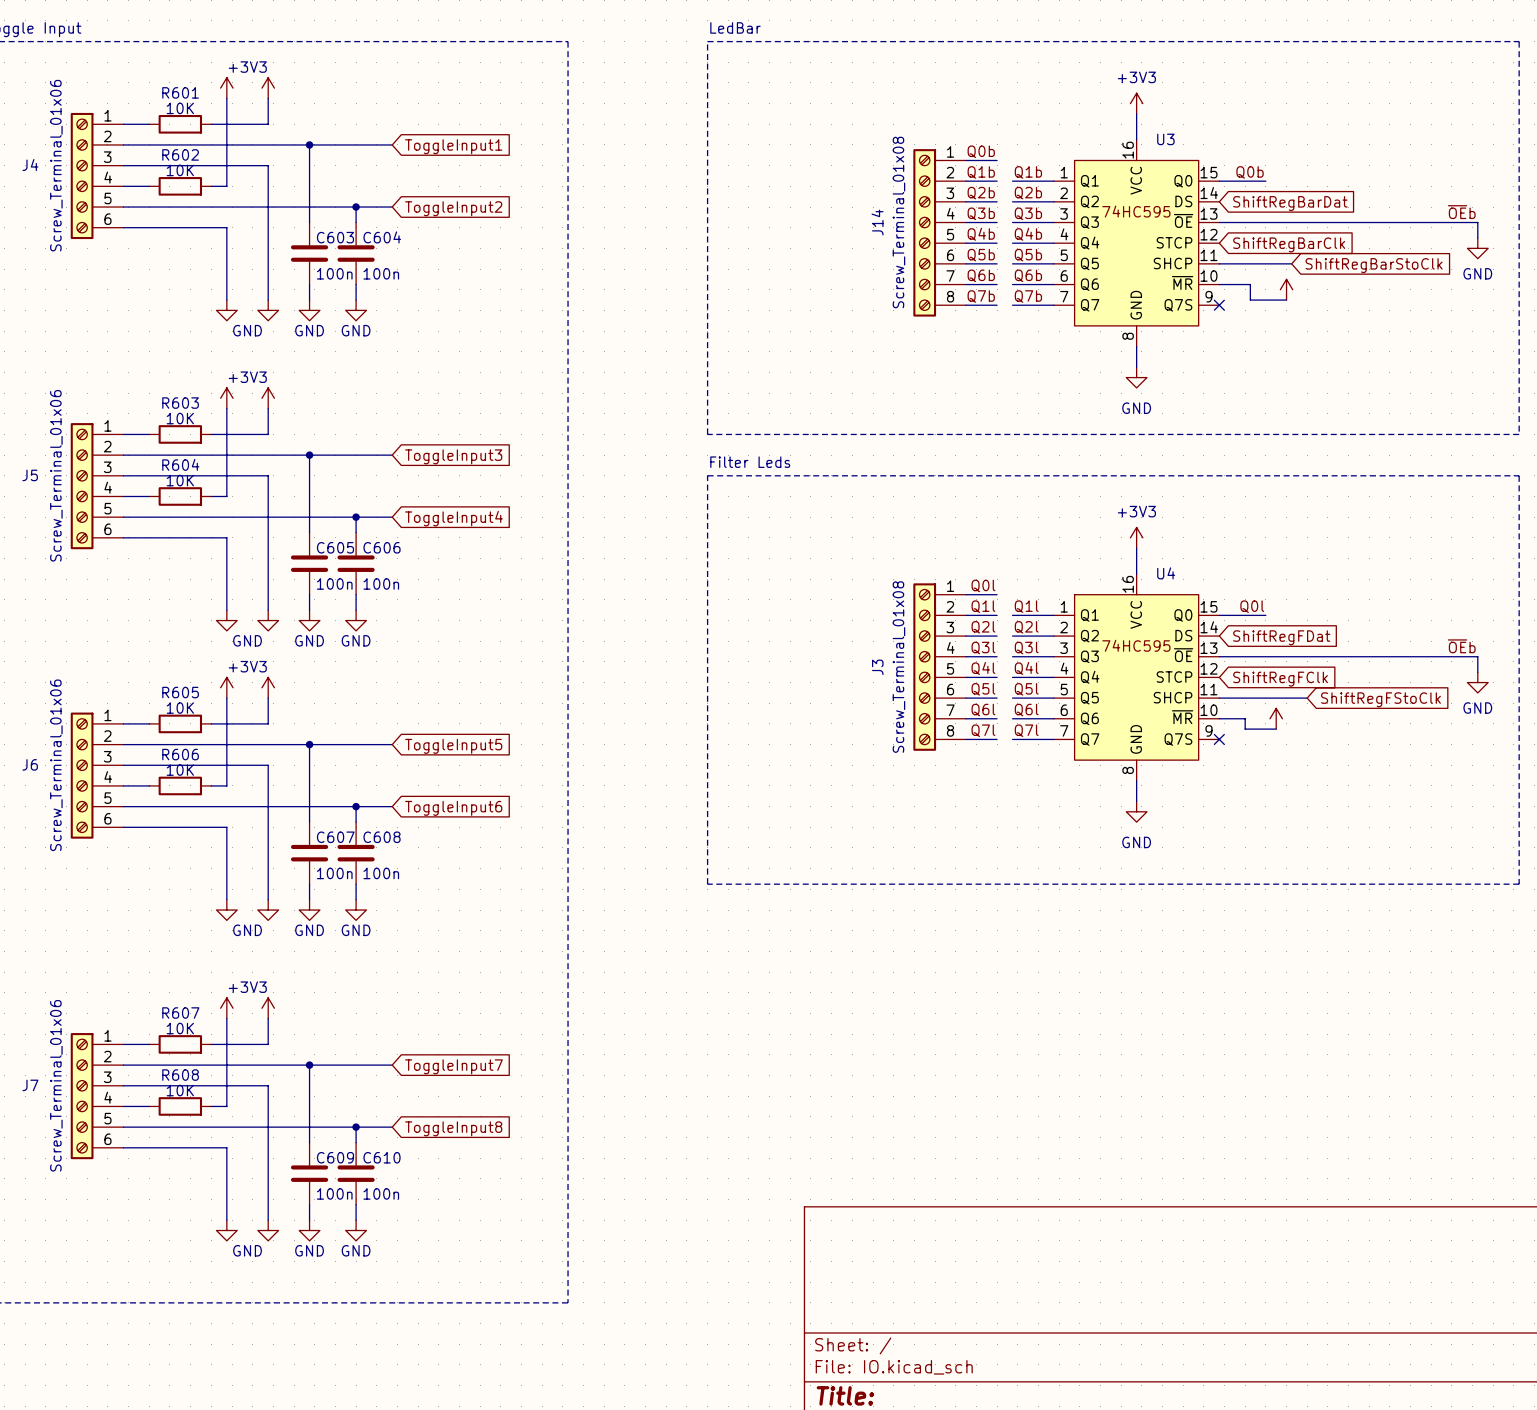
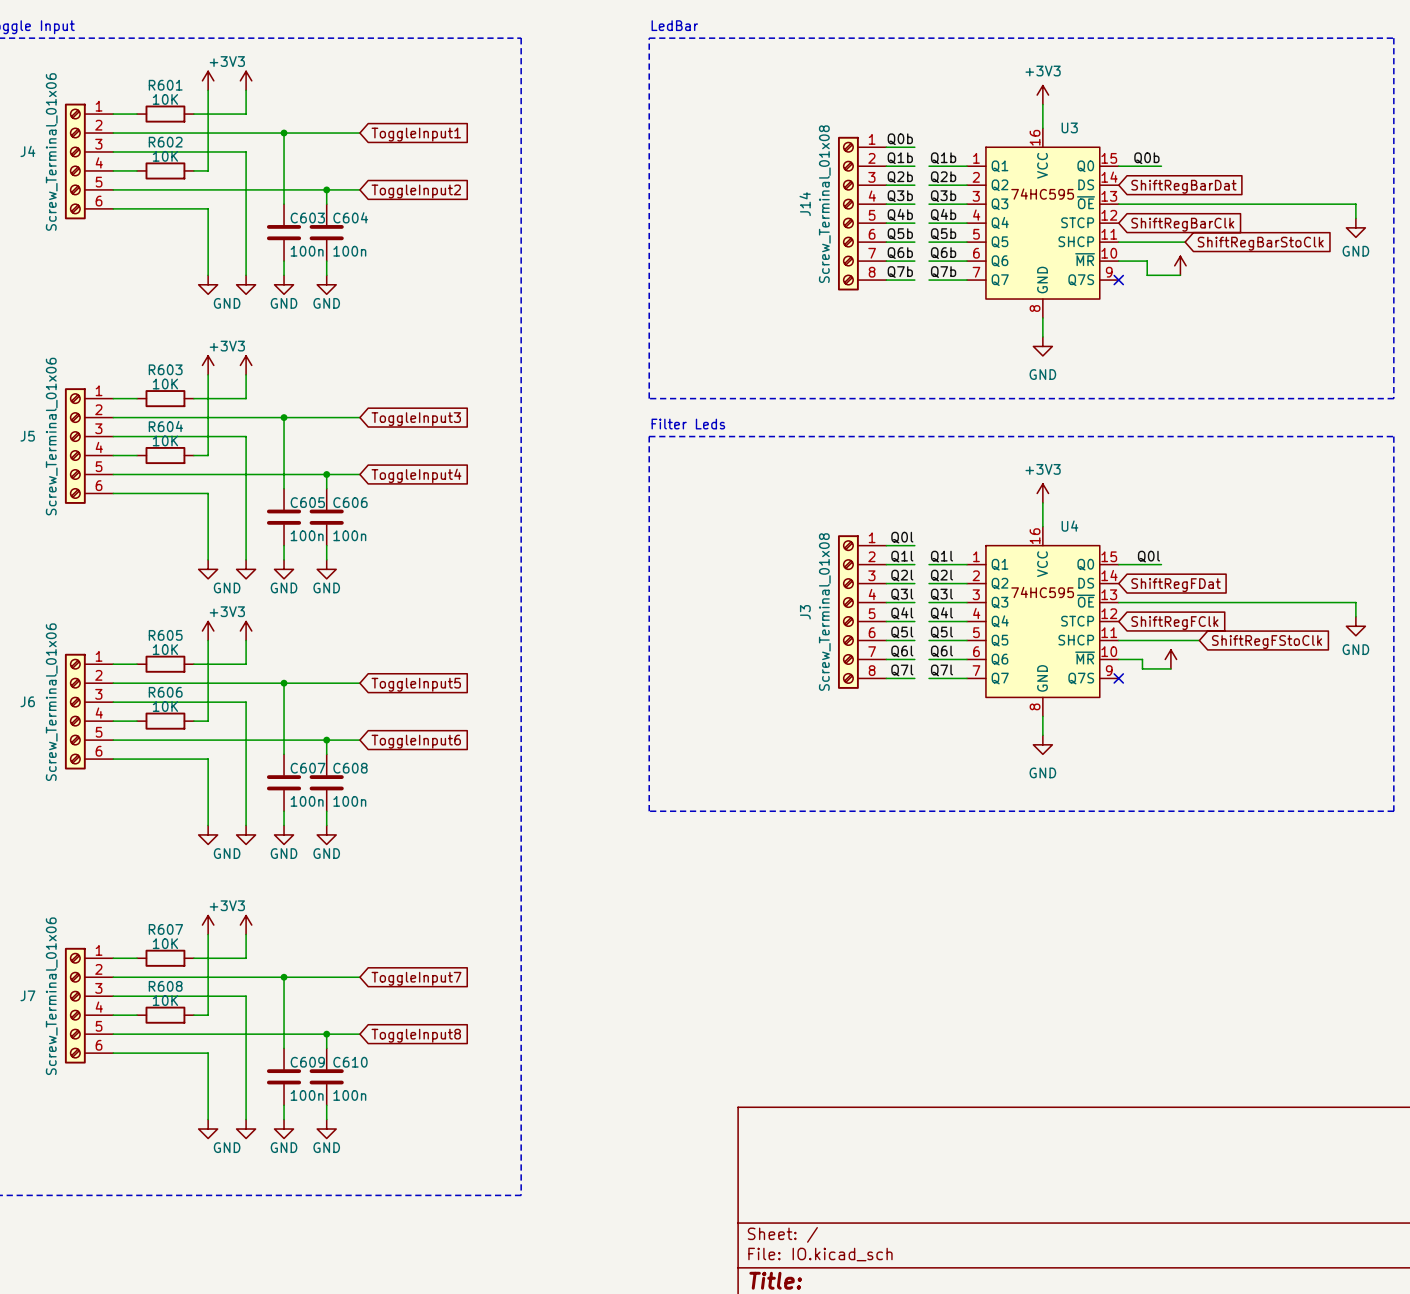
label: ~{OE}b (1461, 212) -> none
label: ~{OE}b (1461, 646) -> none

